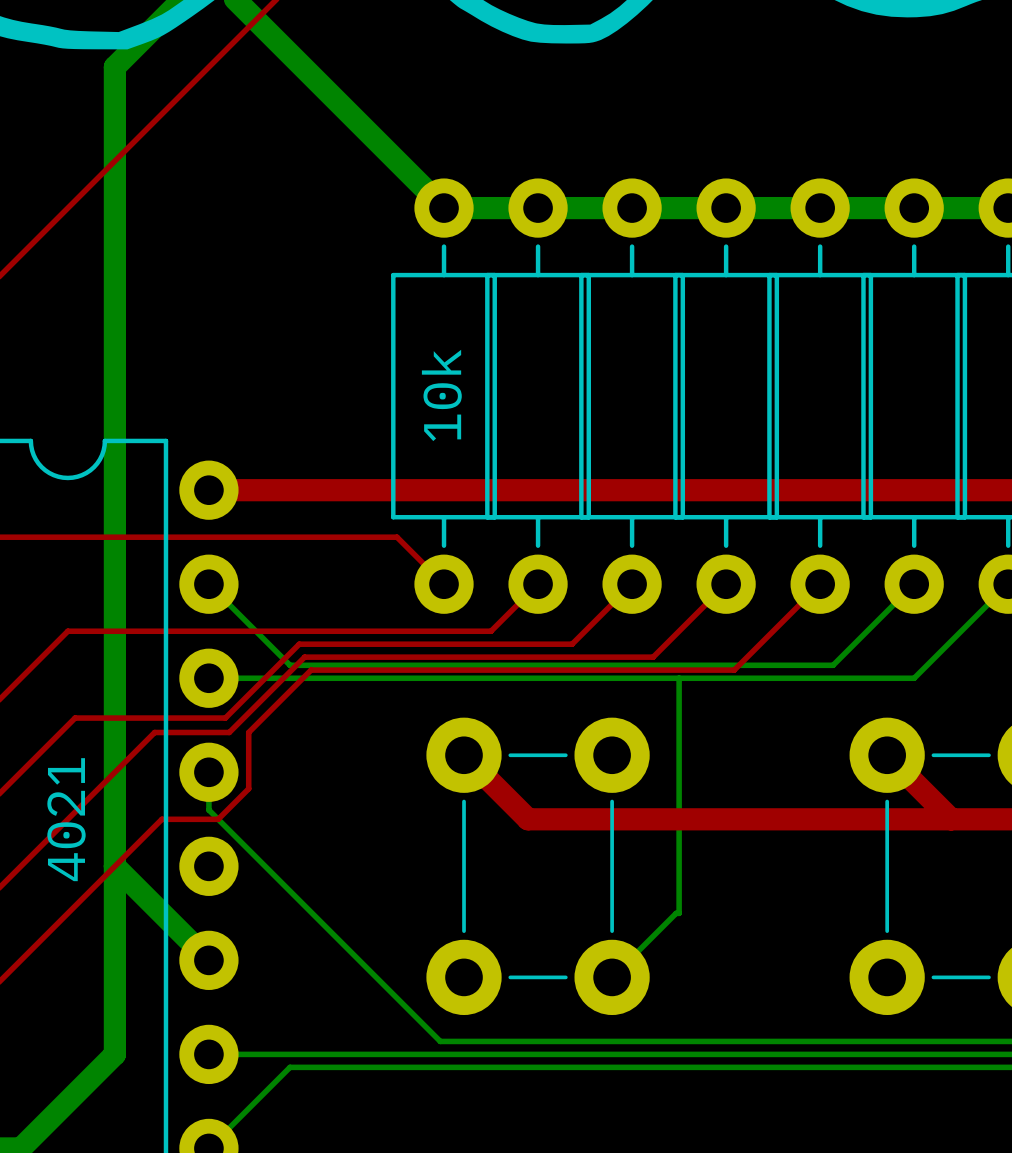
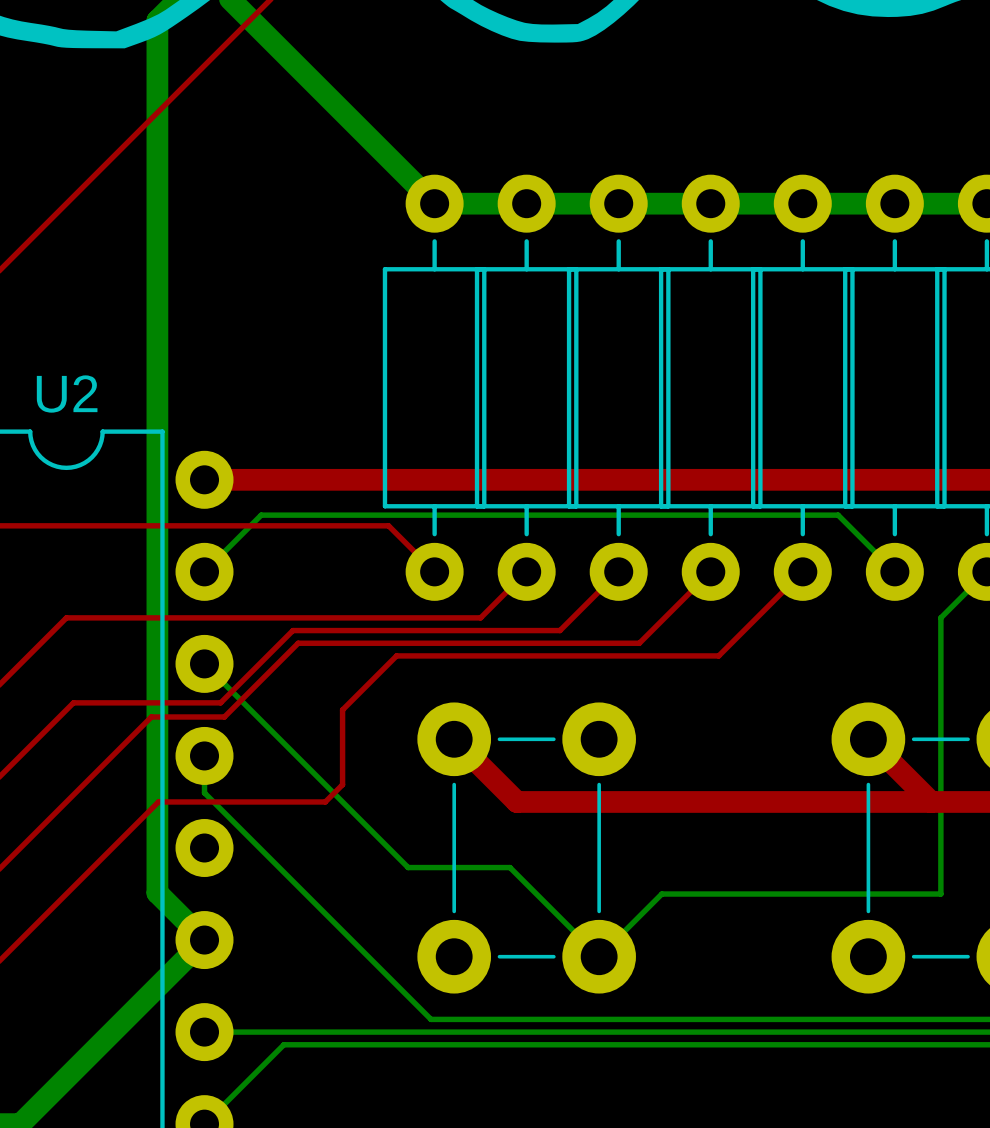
bottom track: (160, 21) (114, 67) (114, 1054) -> (157, 20) (157, 892)
part value: 10k (441, 395) -> none
U2 name: none -> U2 (67, 394)
bottom track: (208, 584) (290, 665) (833, 665) (914, 584) -> (204, 571) (261, 515) (838, 515) (894, 571)
bottom track: (961, 631) (914, 678) (208, 678) -> (599, 956) (510, 867) (408, 867) (204, 663)
top track: (405, 670) (311, 670) (248, 732) (248, 788) (218, 819) -> (396, 655) (342, 709) (342, 784) (325, 801) (213, 801)
bottom track: (679, 678) (679, 913) -> (940, 617) (940, 894) (664, 894)
U2 value: 4021 (66, 819) -> none
bottom track: (114, 866) (160, 912) -> none
bottom track: none -> (204, 940) (112, 1032)

